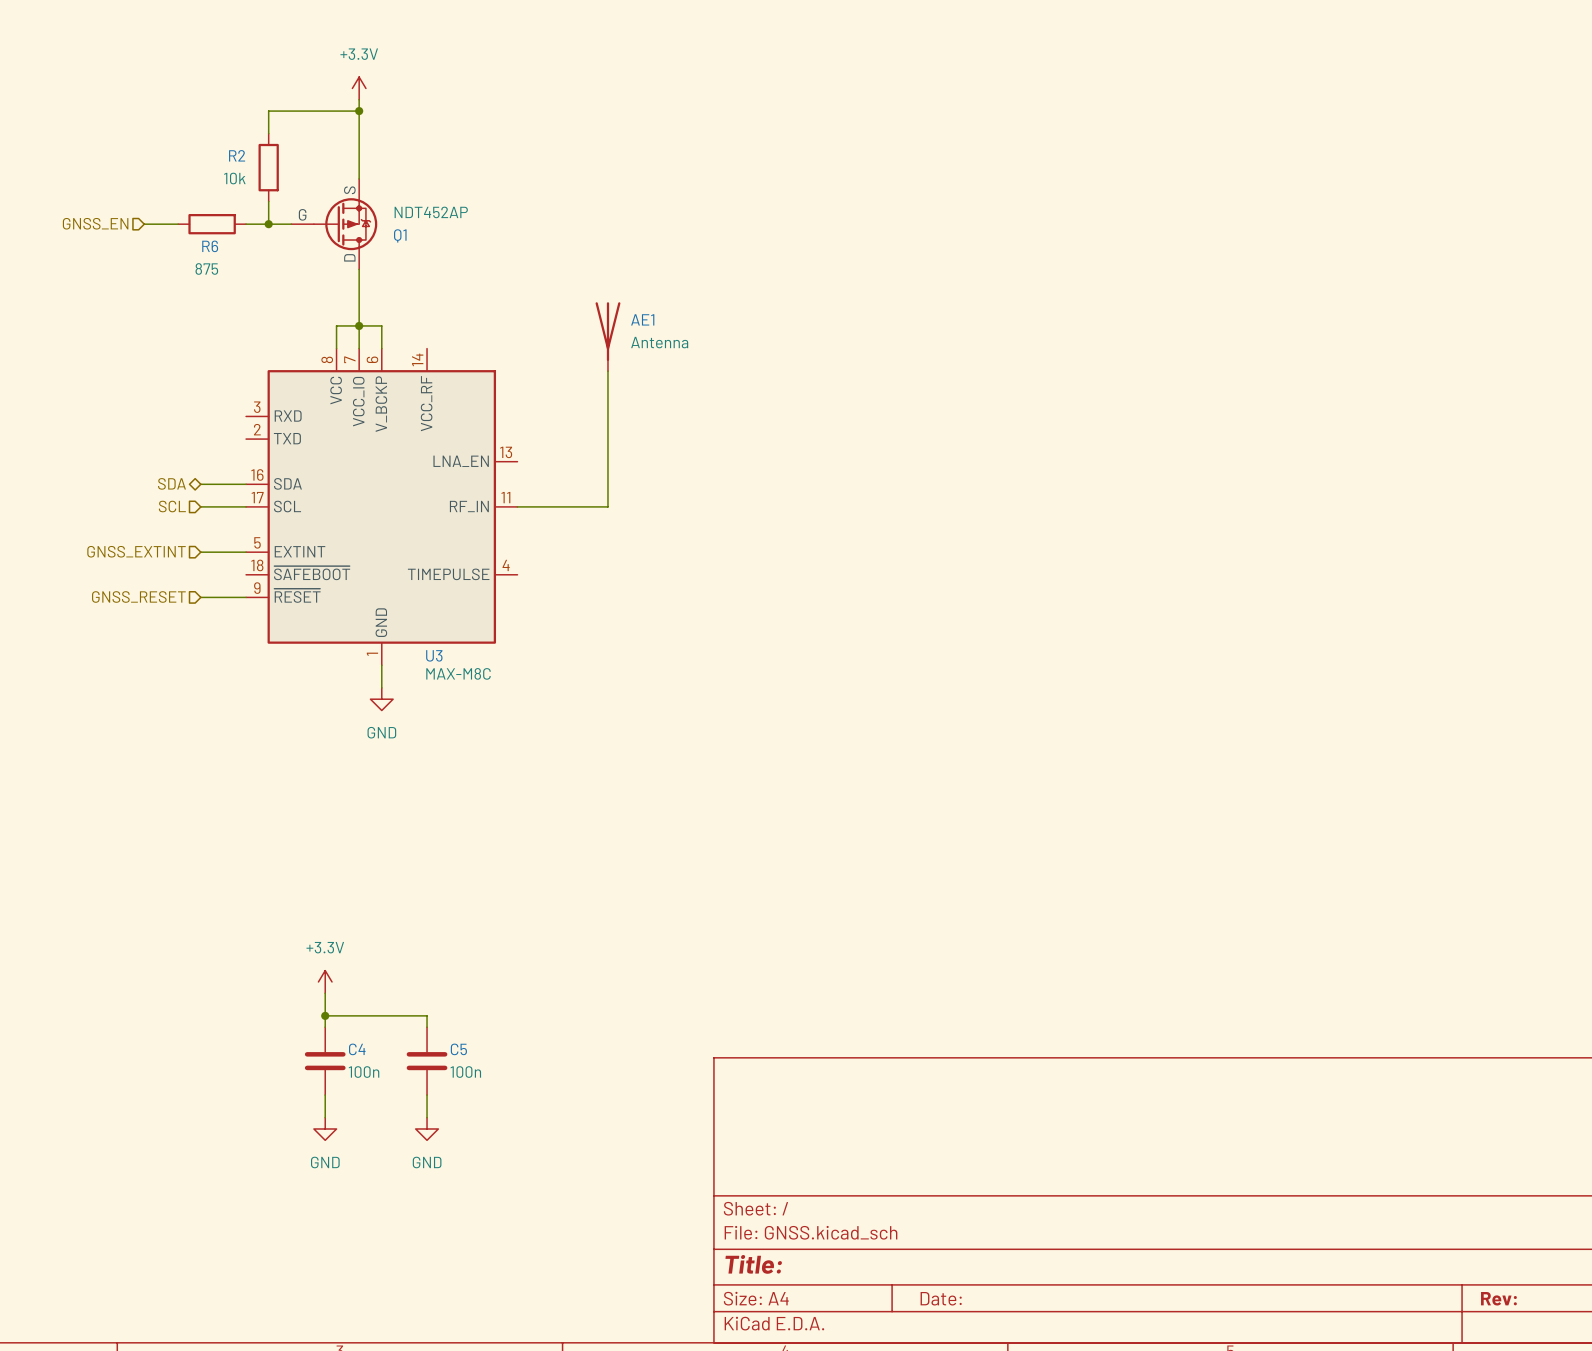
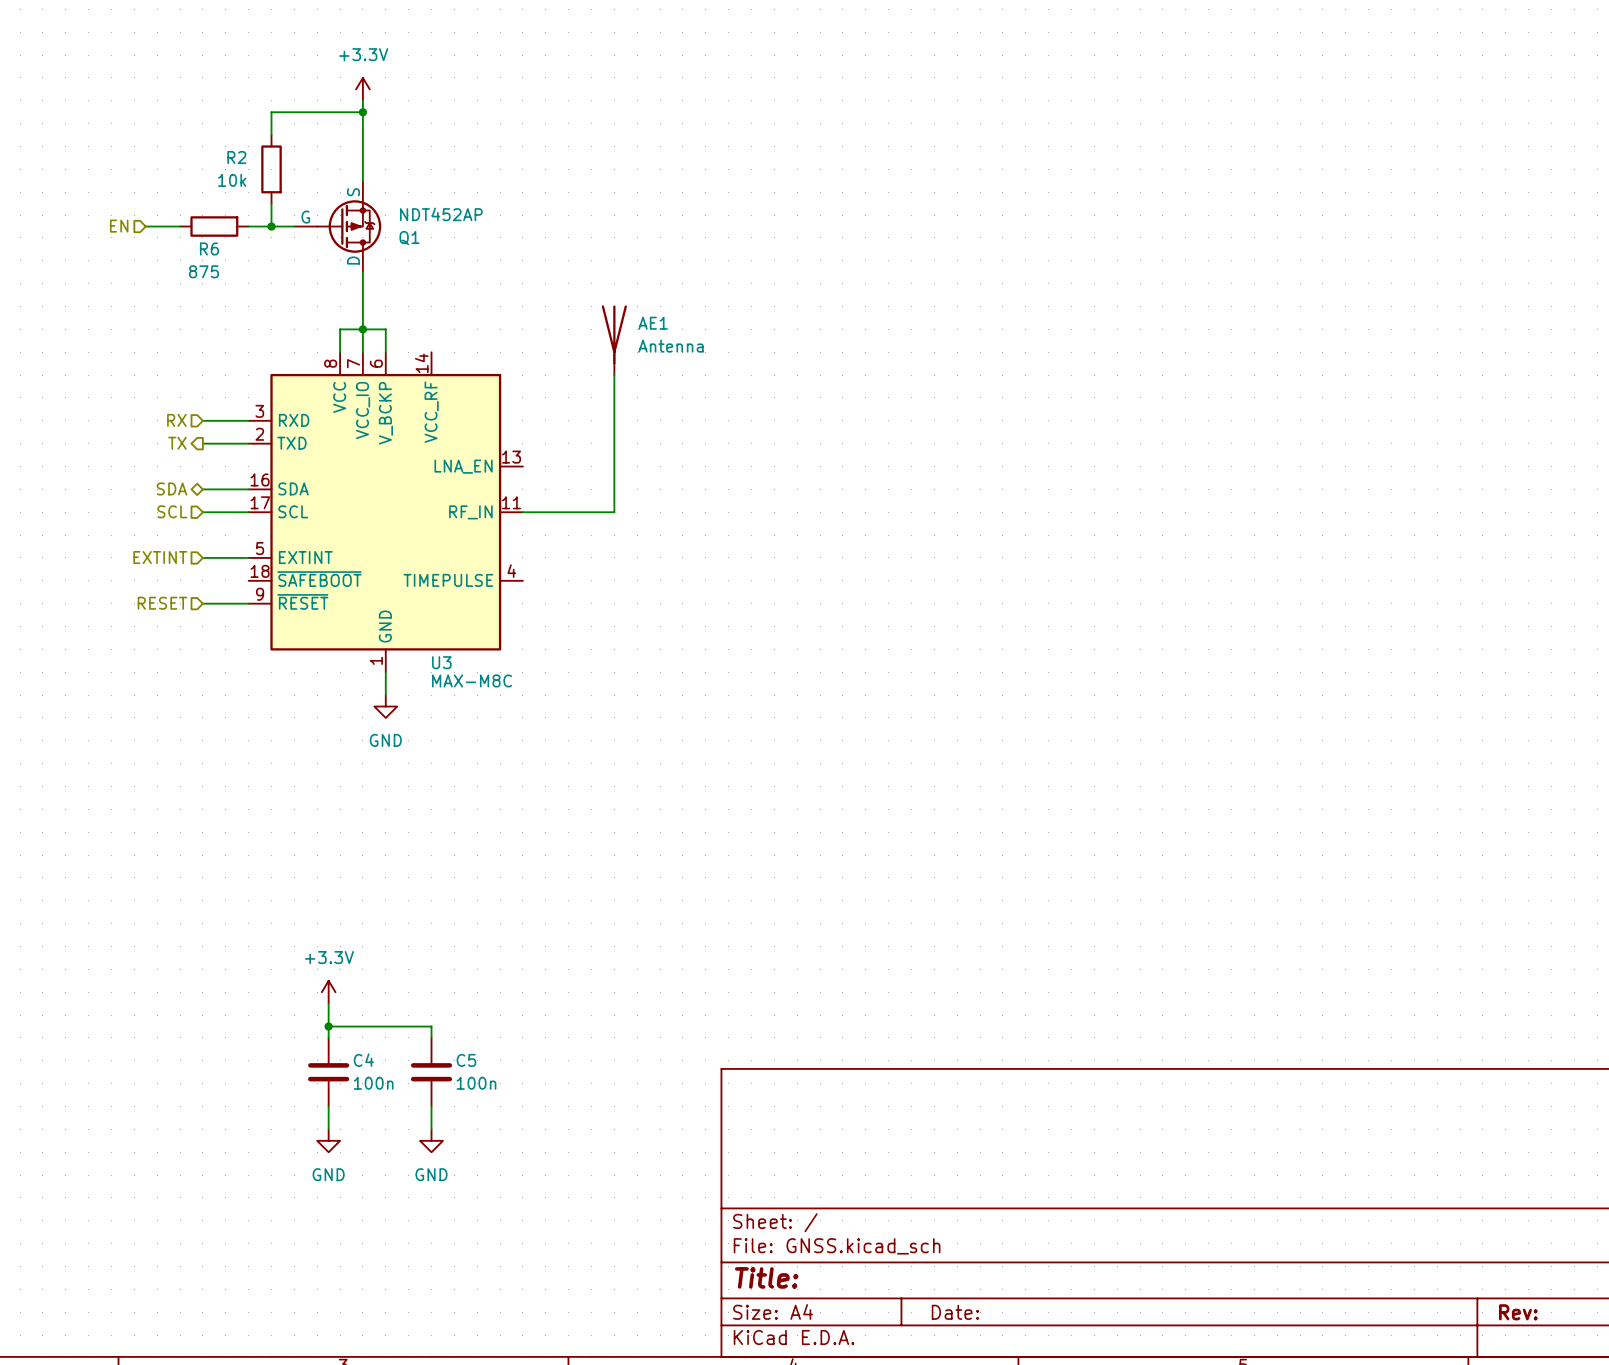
hierarchical label: GNSS_EN (95, 223) -> EN (119, 226)
hierarchical label: none -> RX (176, 420)
wire: none -> (202, 420) (248, 420)
hierarchical label: none -> TX (177, 443)
wire: none -> (202, 443) (248, 443)
hierarchical label: GNSS_EXTINT (136, 551) -> EXTINT (160, 557)
hierarchical label: GNSS_RESET (138, 596) -> RESET (162, 603)

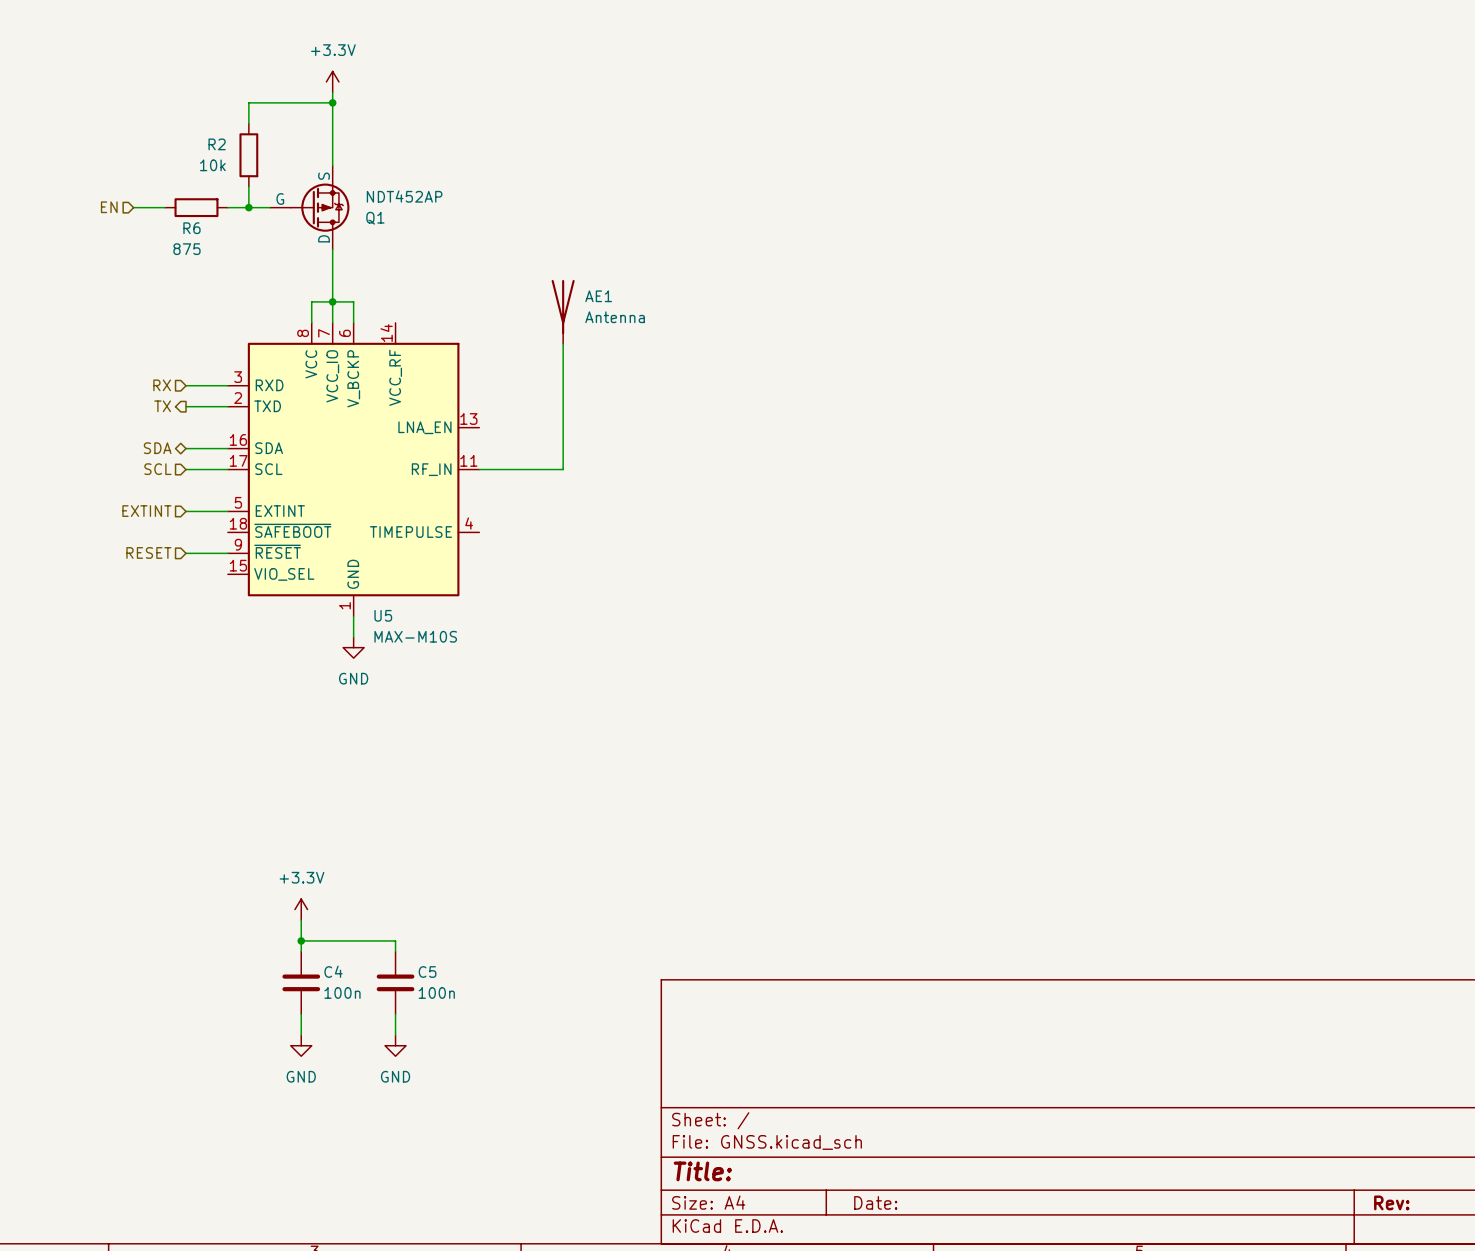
U3: MAX-M8C (385, 512) -> none
U5: none -> MAX-M10S (353, 469)

